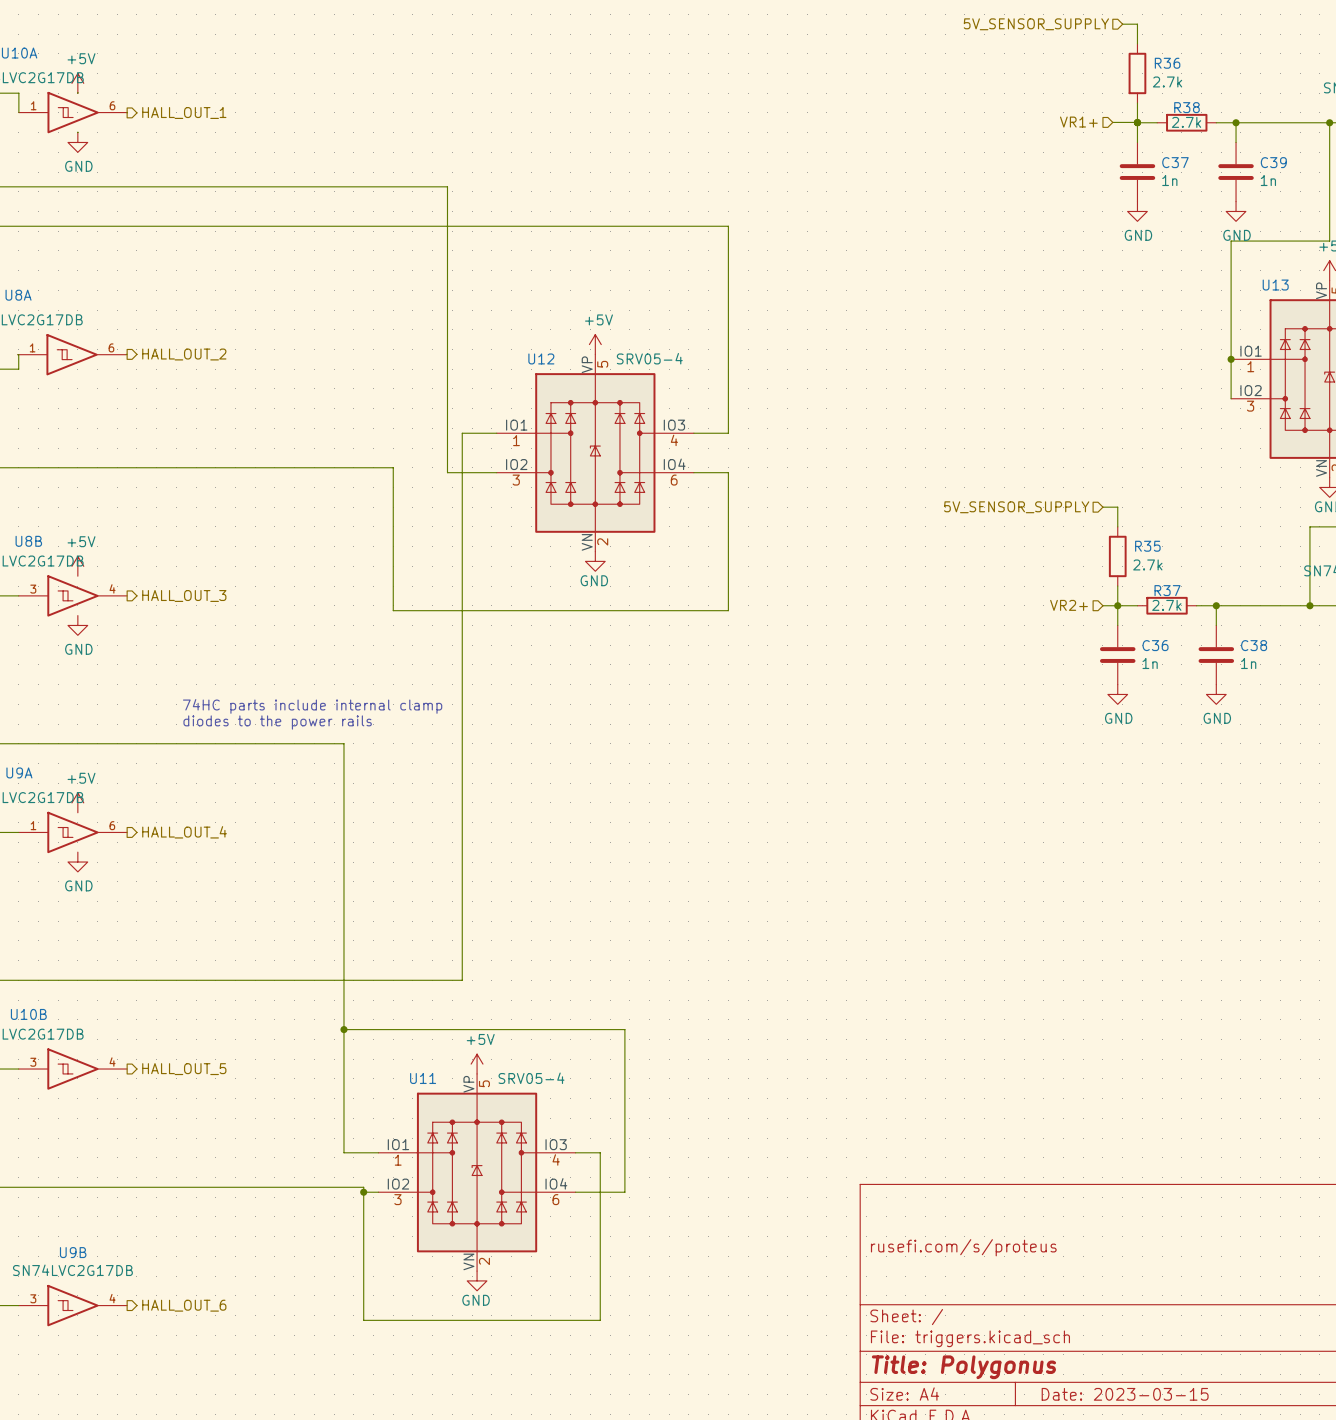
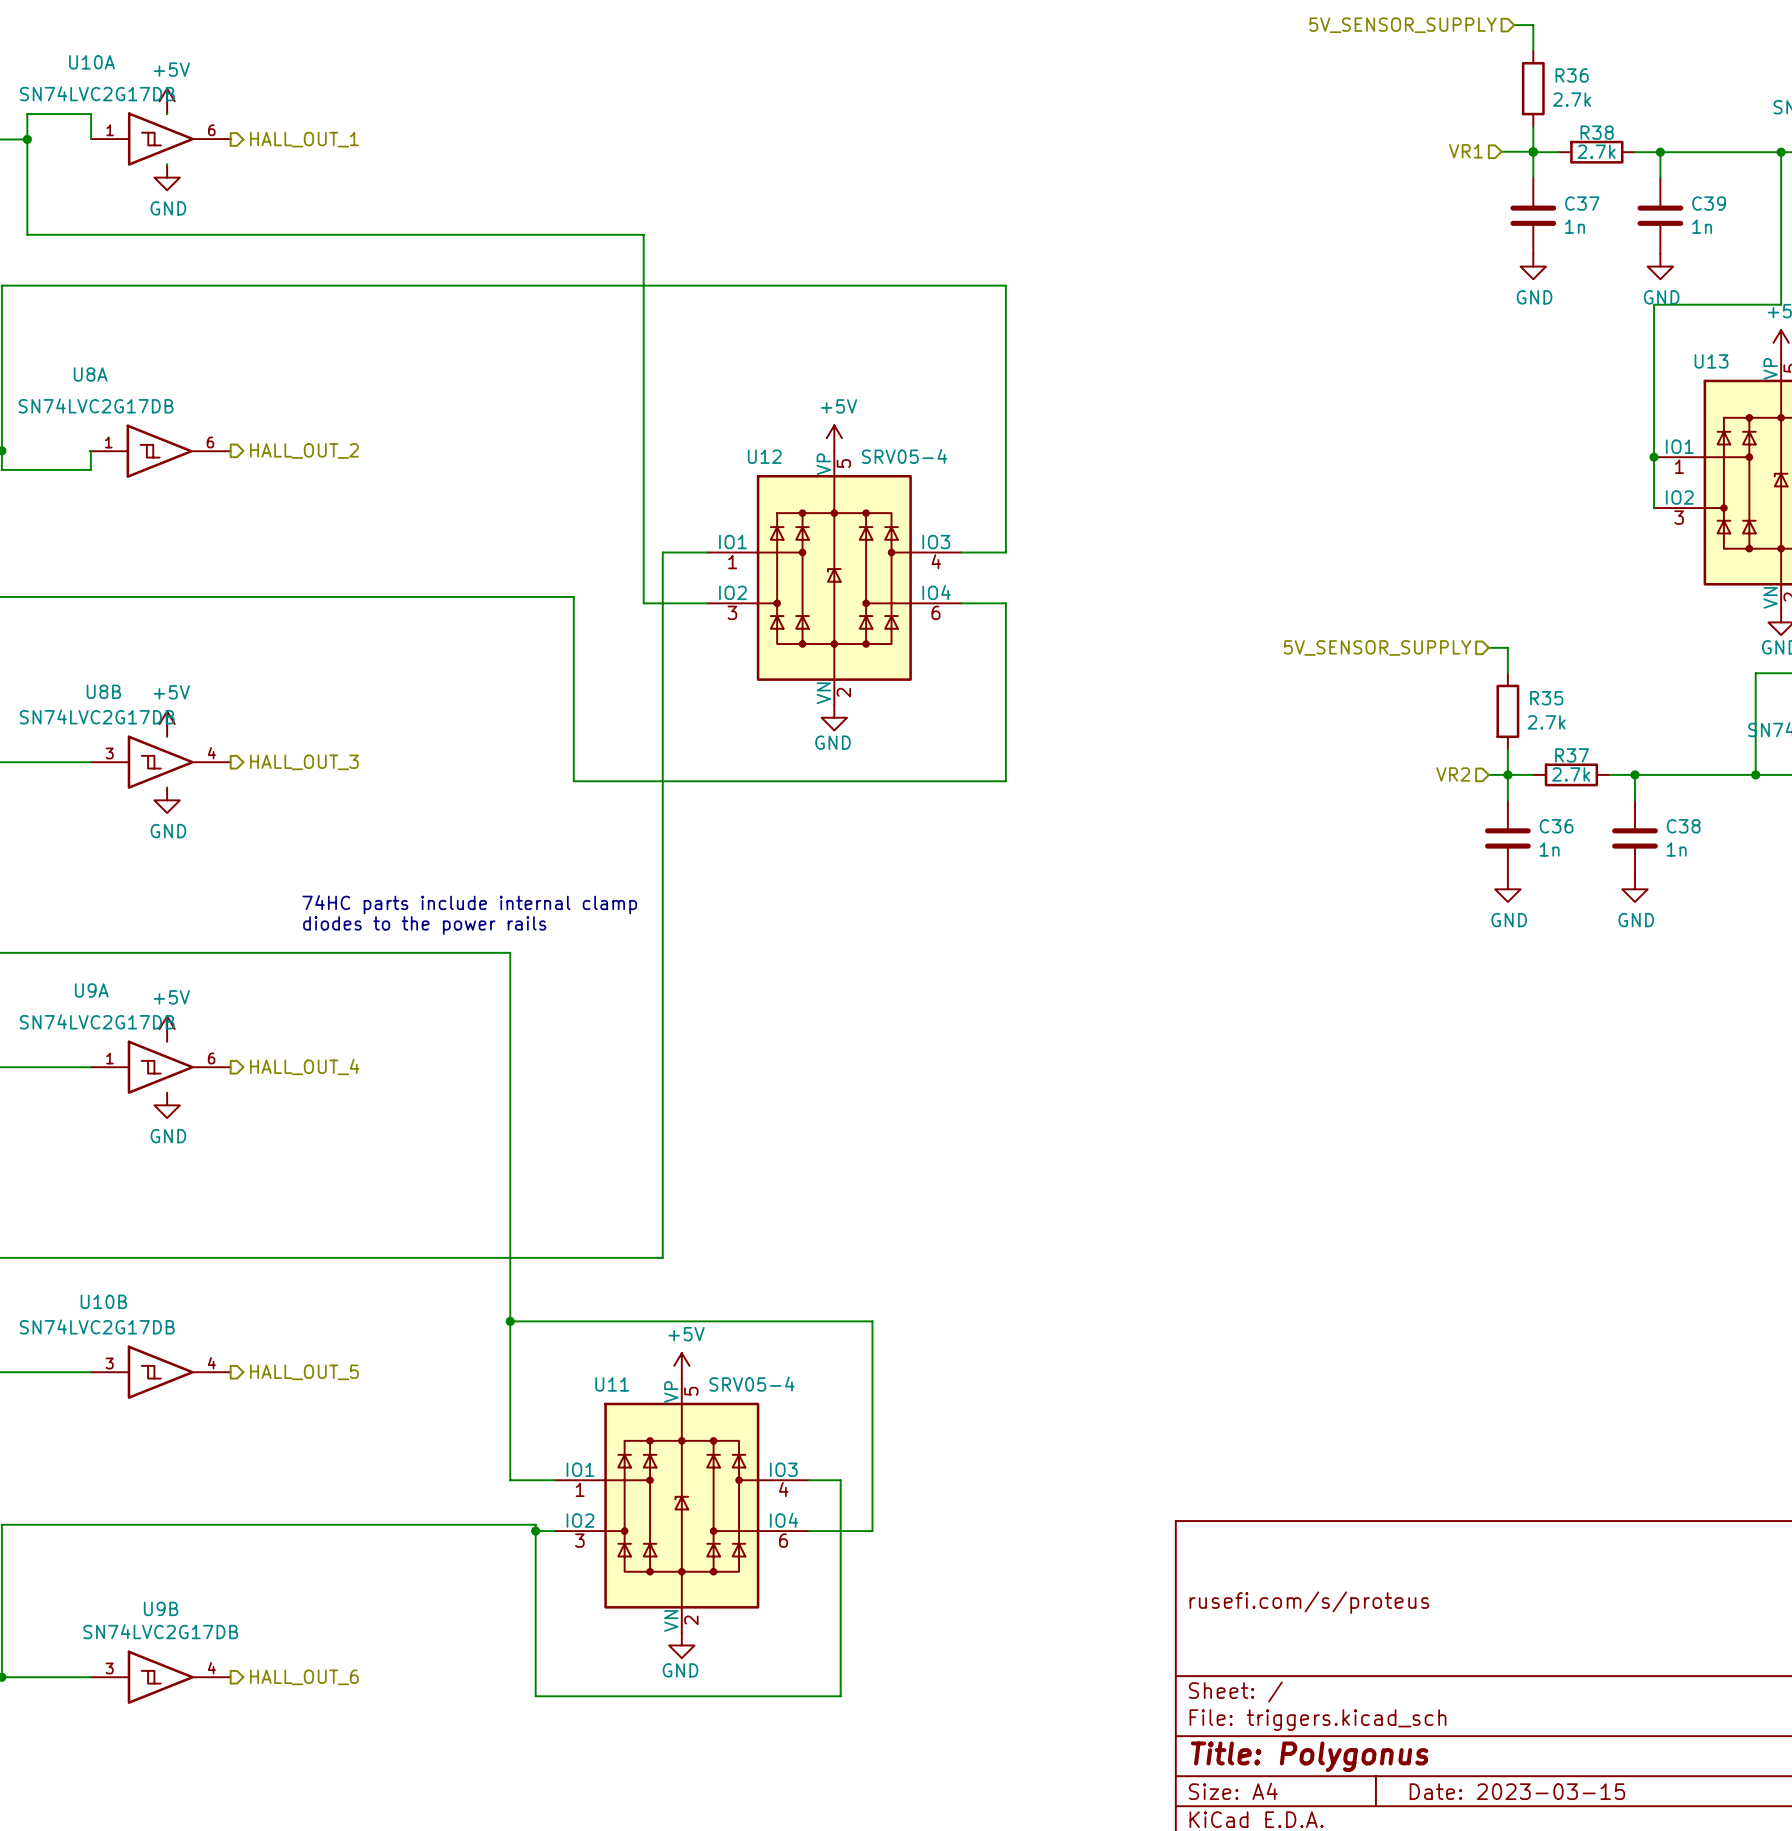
hierarchical label: VR1+ (1078, 122) -> VR1 (1465, 151)
hierarchical label: VR2+ (1069, 605) -> VR2 (1453, 774)

